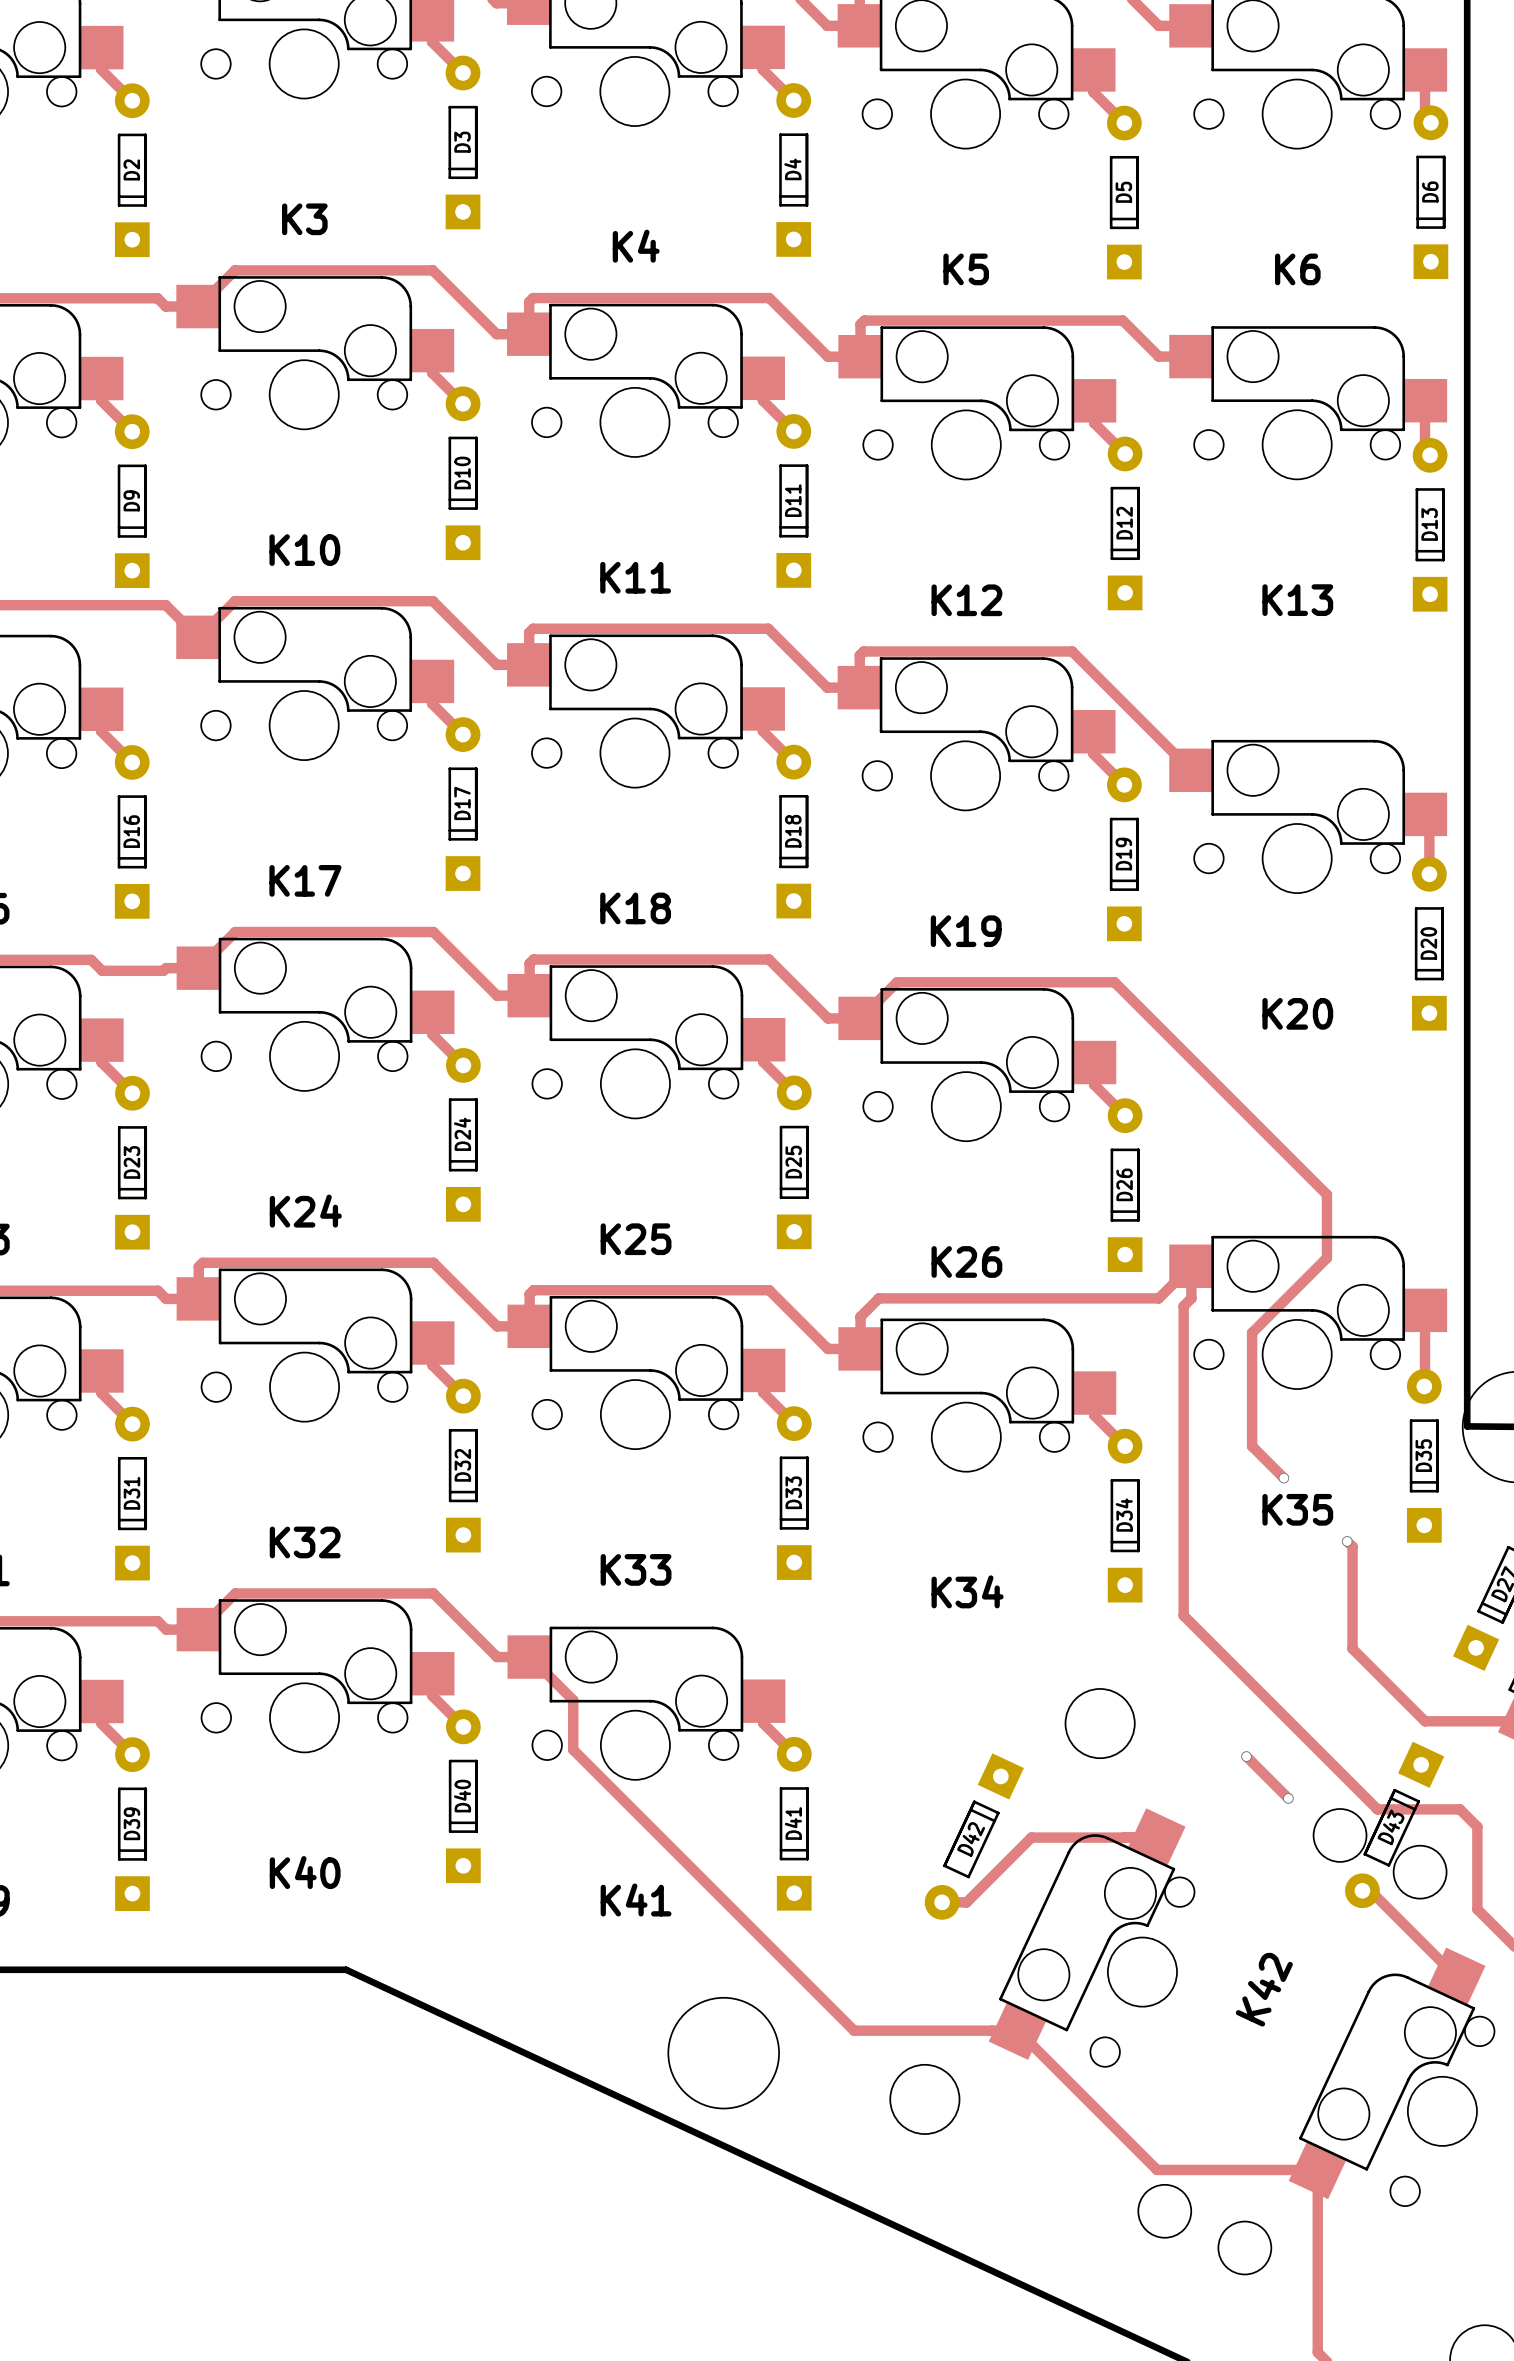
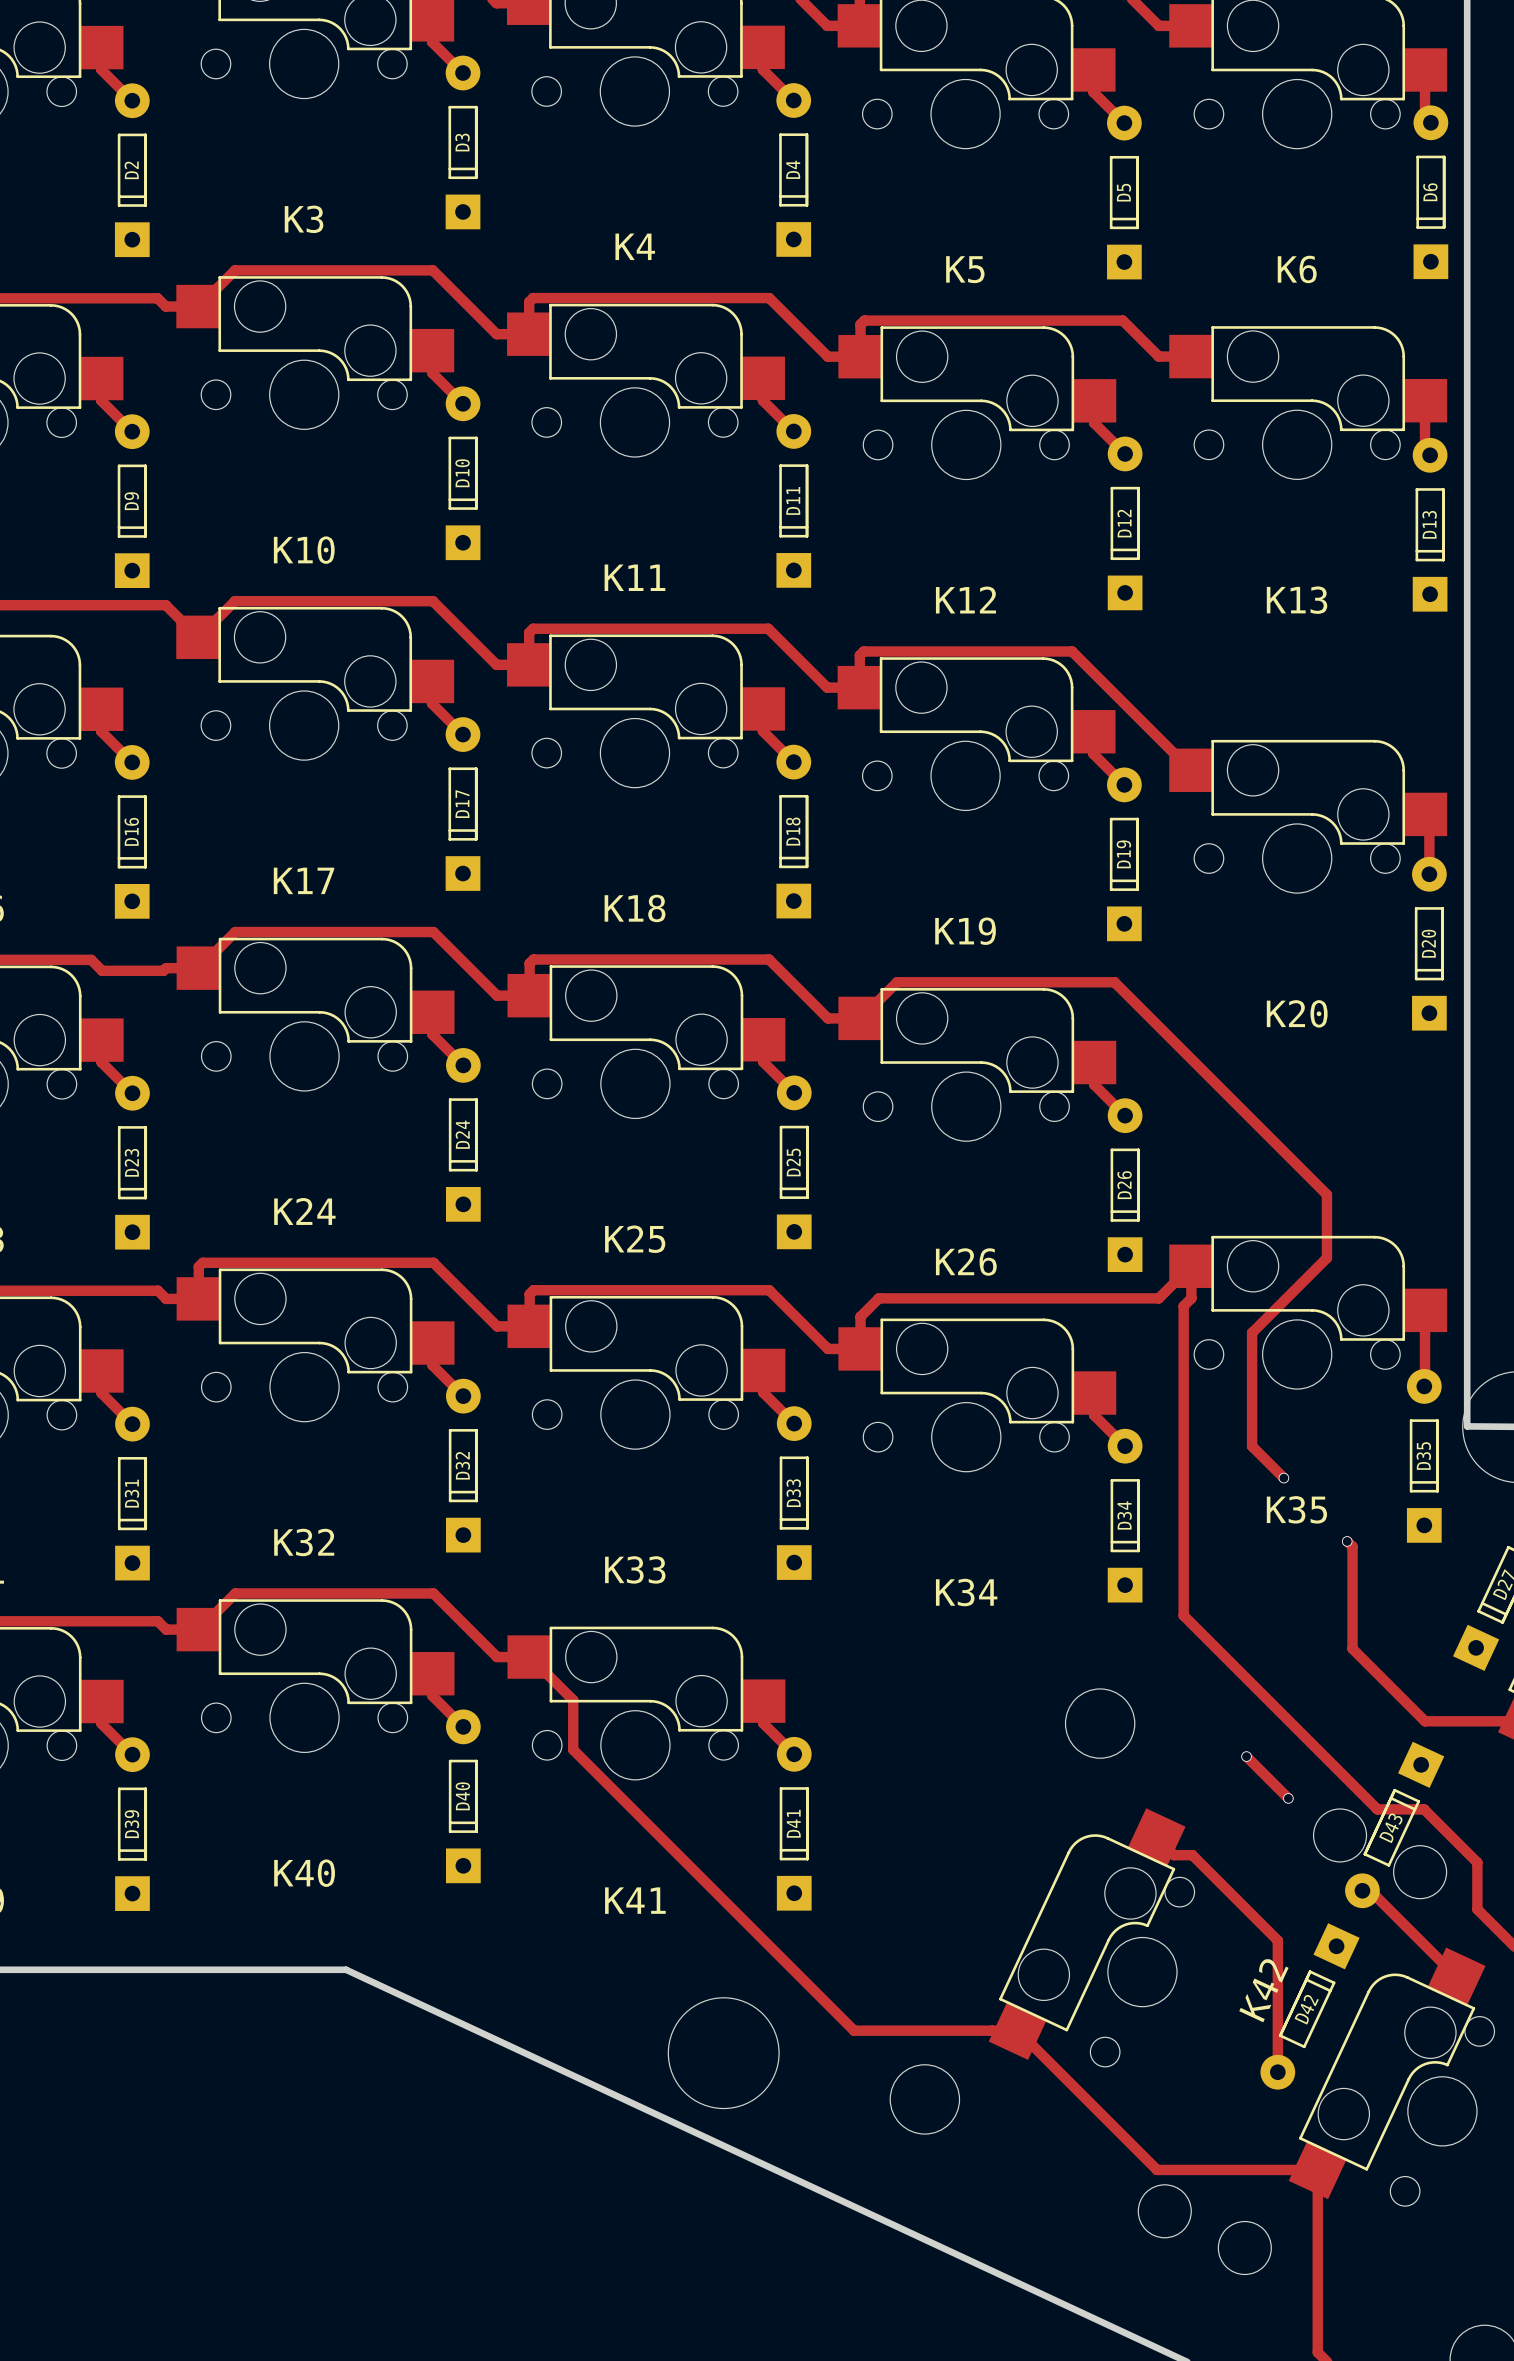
track: (1424, 1809) (1459, 1809) (1477, 1826) (1477, 1862) -> (1424, 1809) (1477, 1862)
D42 position: (974, 1836) -> (1310, 2006)
track: (1156, 1837) (1031, 1837) (966, 1902) (942, 1902) -> (1156, 1837) (1174, 1855) (1192, 1855) (1277, 1940) (1277, 2072)

